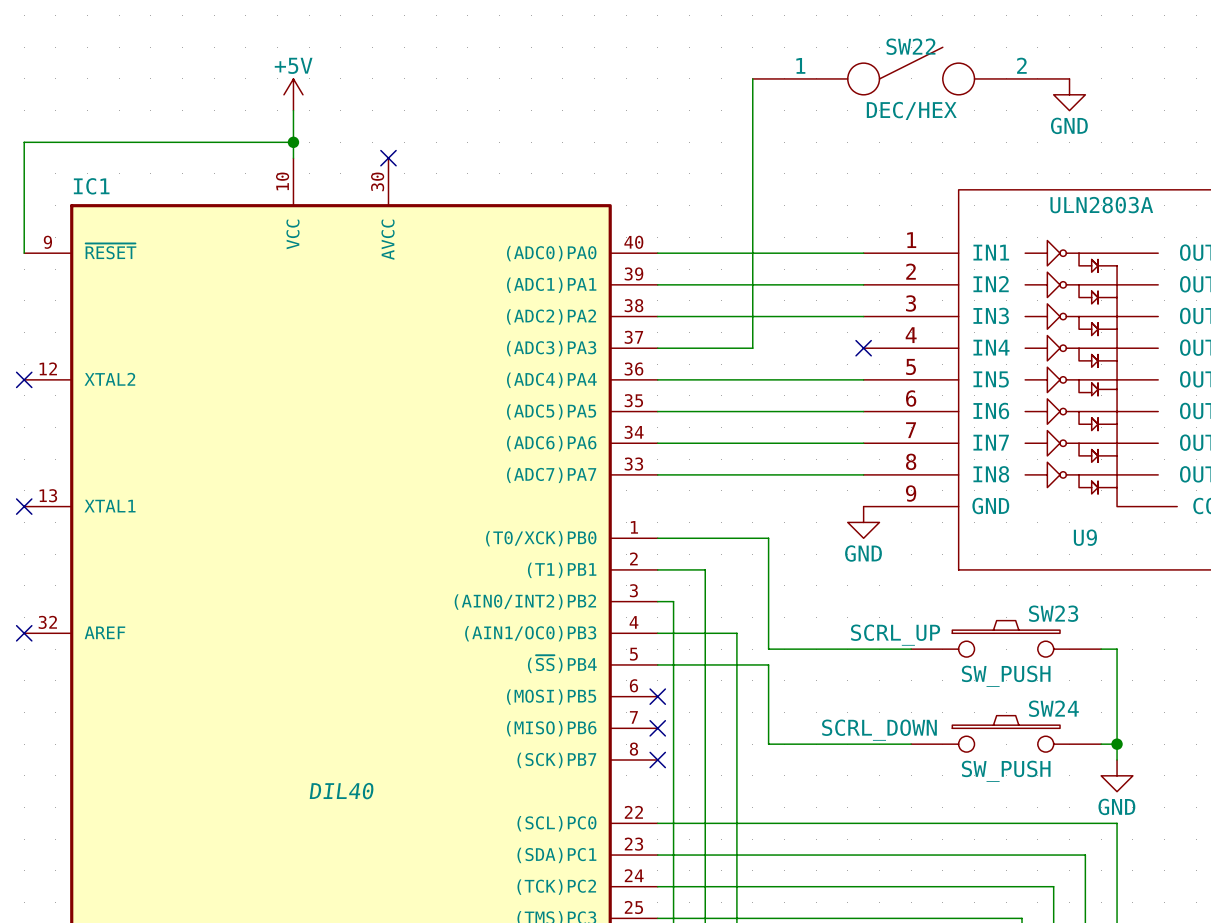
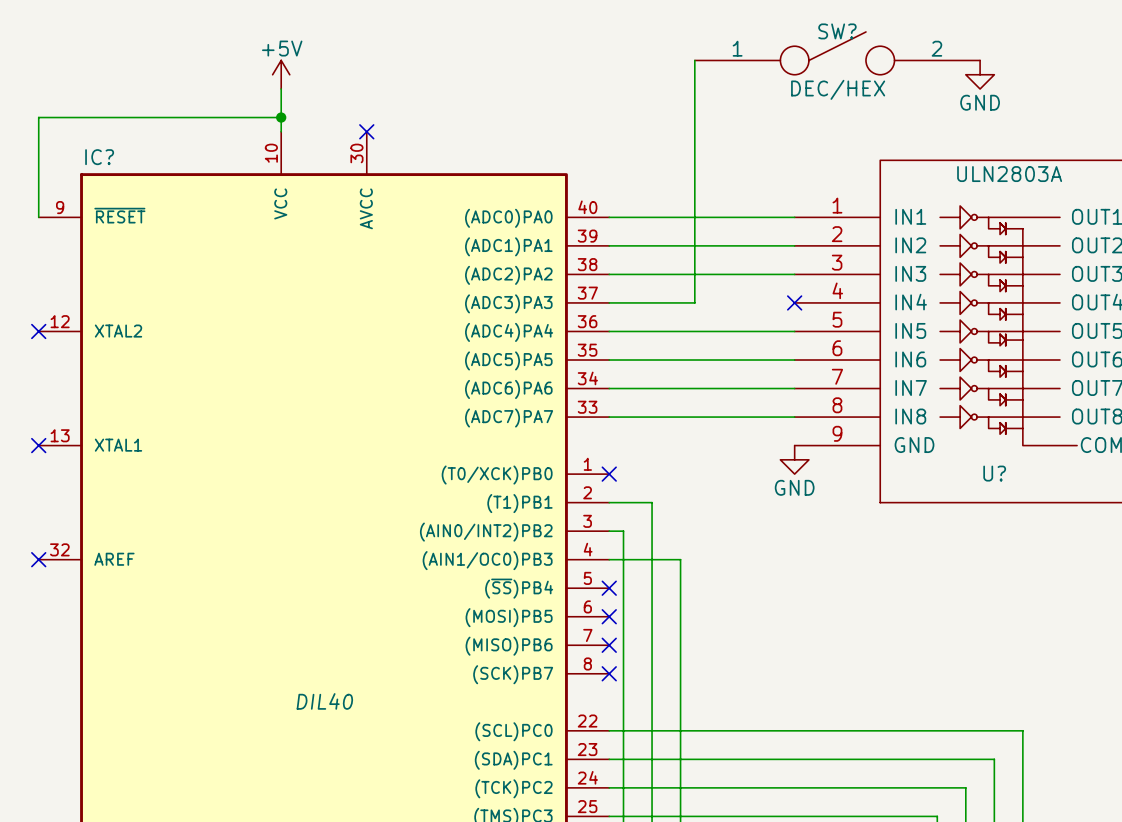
SW22 name: SW22 (910, 46) -> SW? (837, 31)
IC1 name: IC1 (91, 186) -> IC? (99, 157)
U9 name: U9 (1085, 537) -> U? (994, 473)
wire: (657, 538) (768, 538) (768, 649) (911, 649) -> none
no-connect mark: none -> (609, 474)
SW23: SW_PUSH (1006, 638) -> none
wire: (1101, 649) (1117, 649) (1117, 760) -> none
wire: (657, 664) (768, 664) (768, 744) (911, 744) -> none
no-connect mark: none -> (609, 588)
SW24: SW_PUSH (1006, 733) -> none
wire: (1101, 744) (1117, 744) -> none
junction: (1117, 744) -> none
power symbol: GND (1117, 775) -> none

